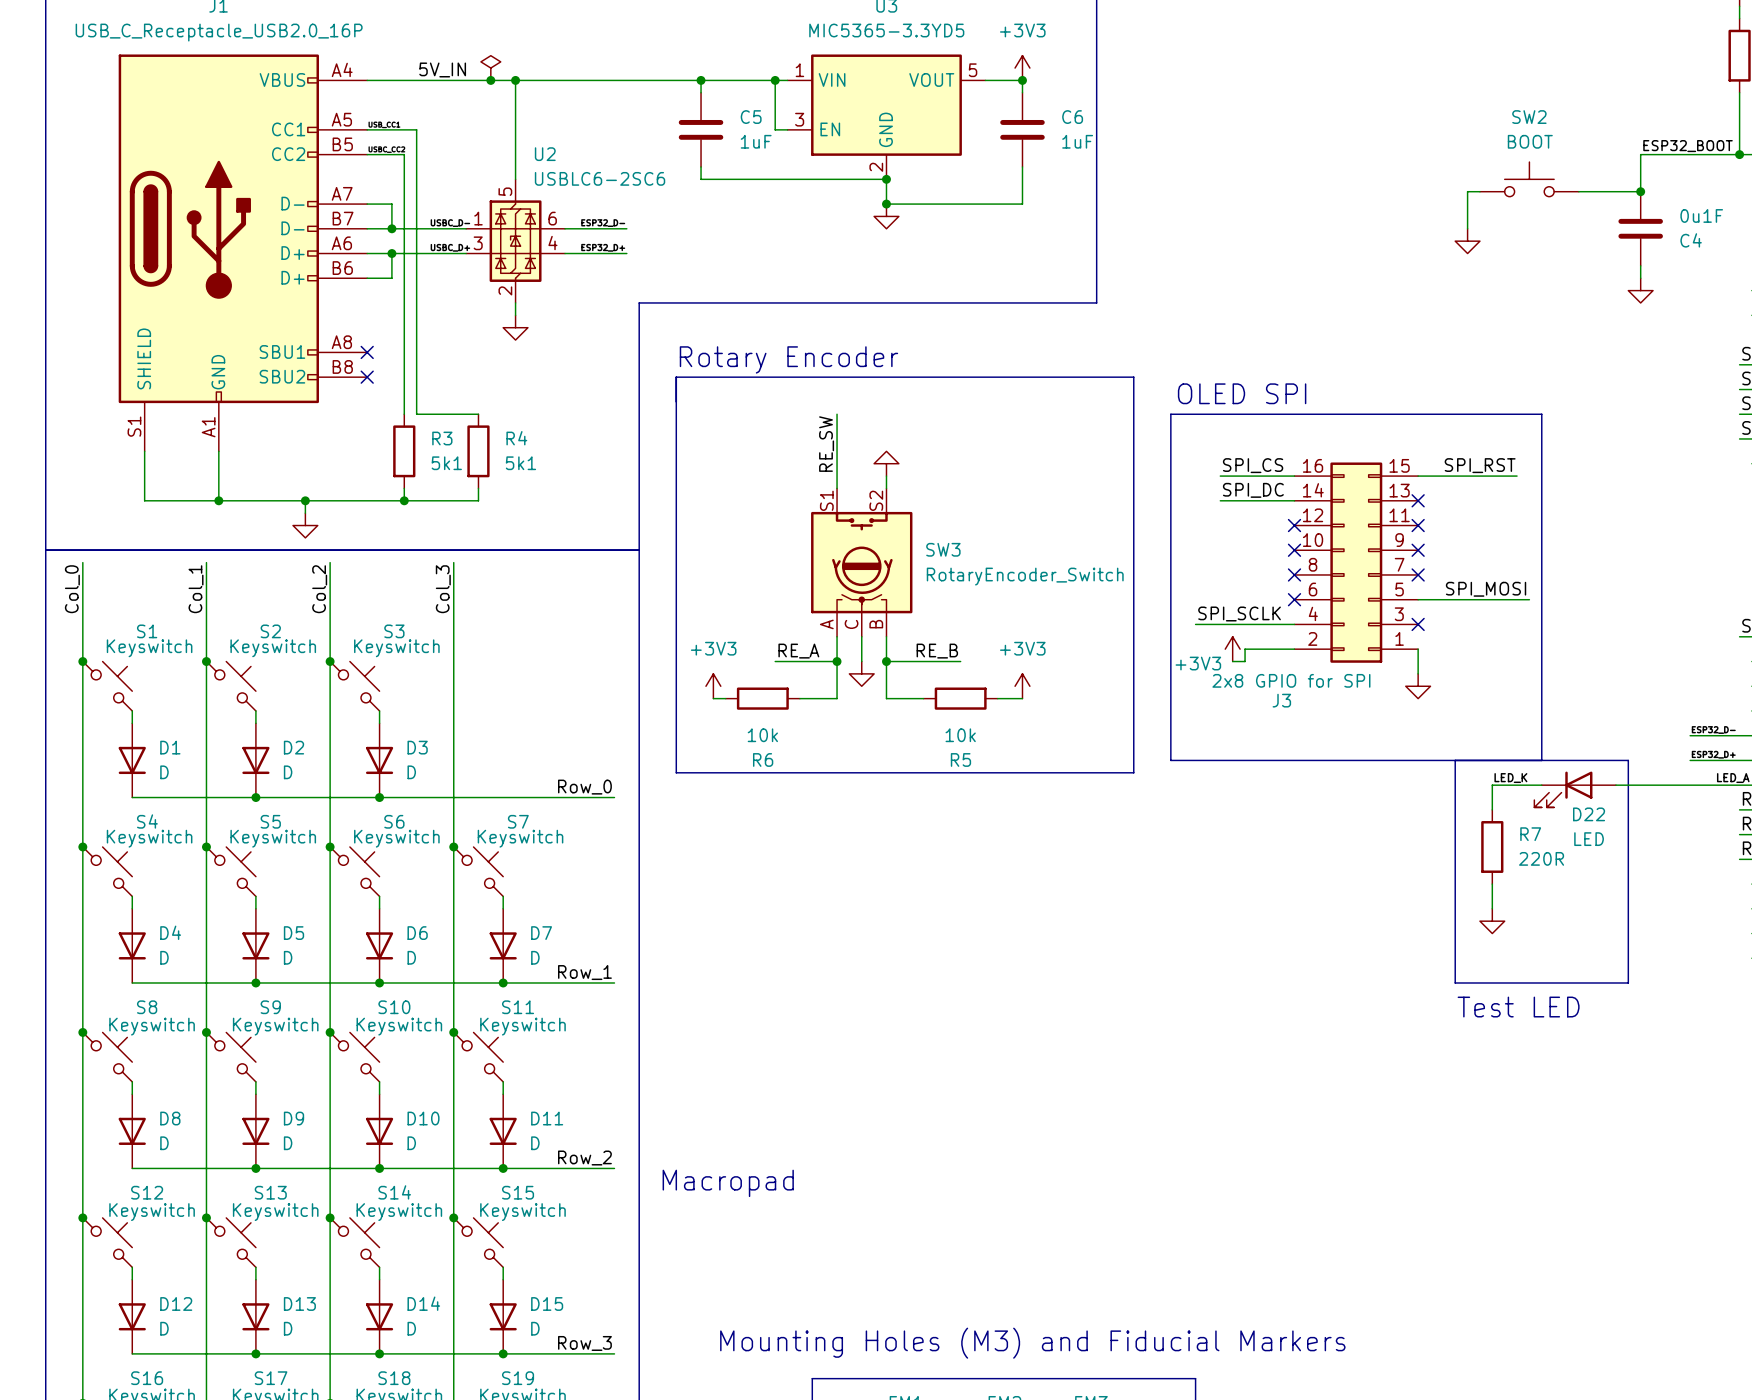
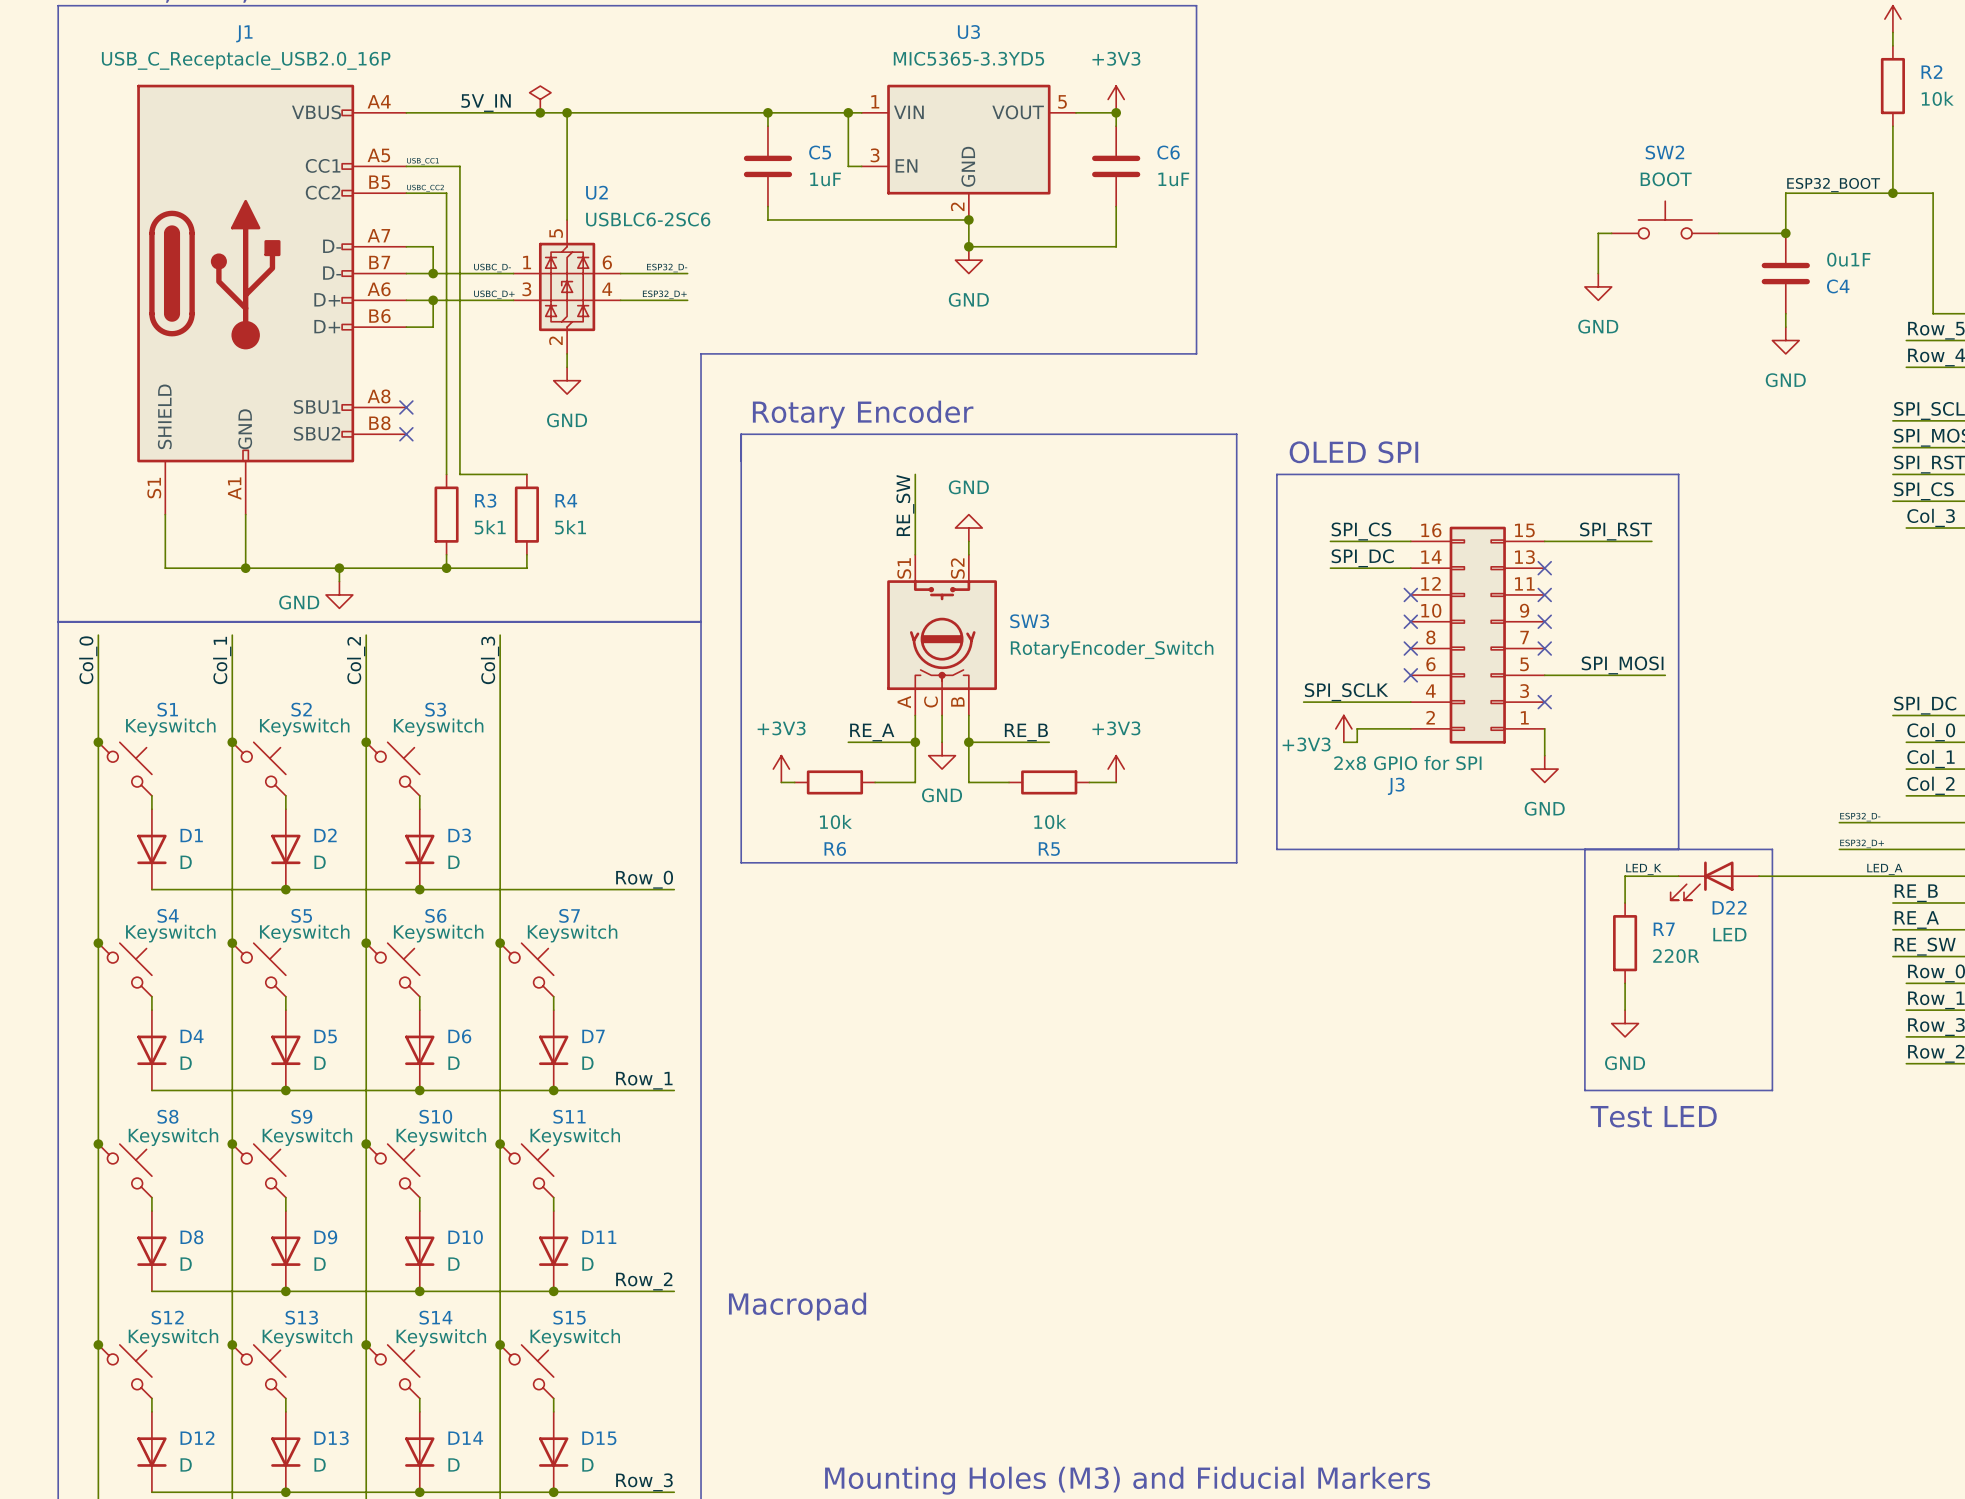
power symbol text: none -> GND (968, 299)
power symbol text: none -> GND (1598, 326)
power symbol text: none -> GND (1785, 380)
power symbol text: none -> GND (567, 420)
power symbol text: none -> GND (968, 487)
power symbol text: none -> GND (299, 602)
power symbol text: none -> GND (942, 795)
power symbol text: none -> GND (1544, 808)
power symbol text: none -> GND (1625, 1063)

